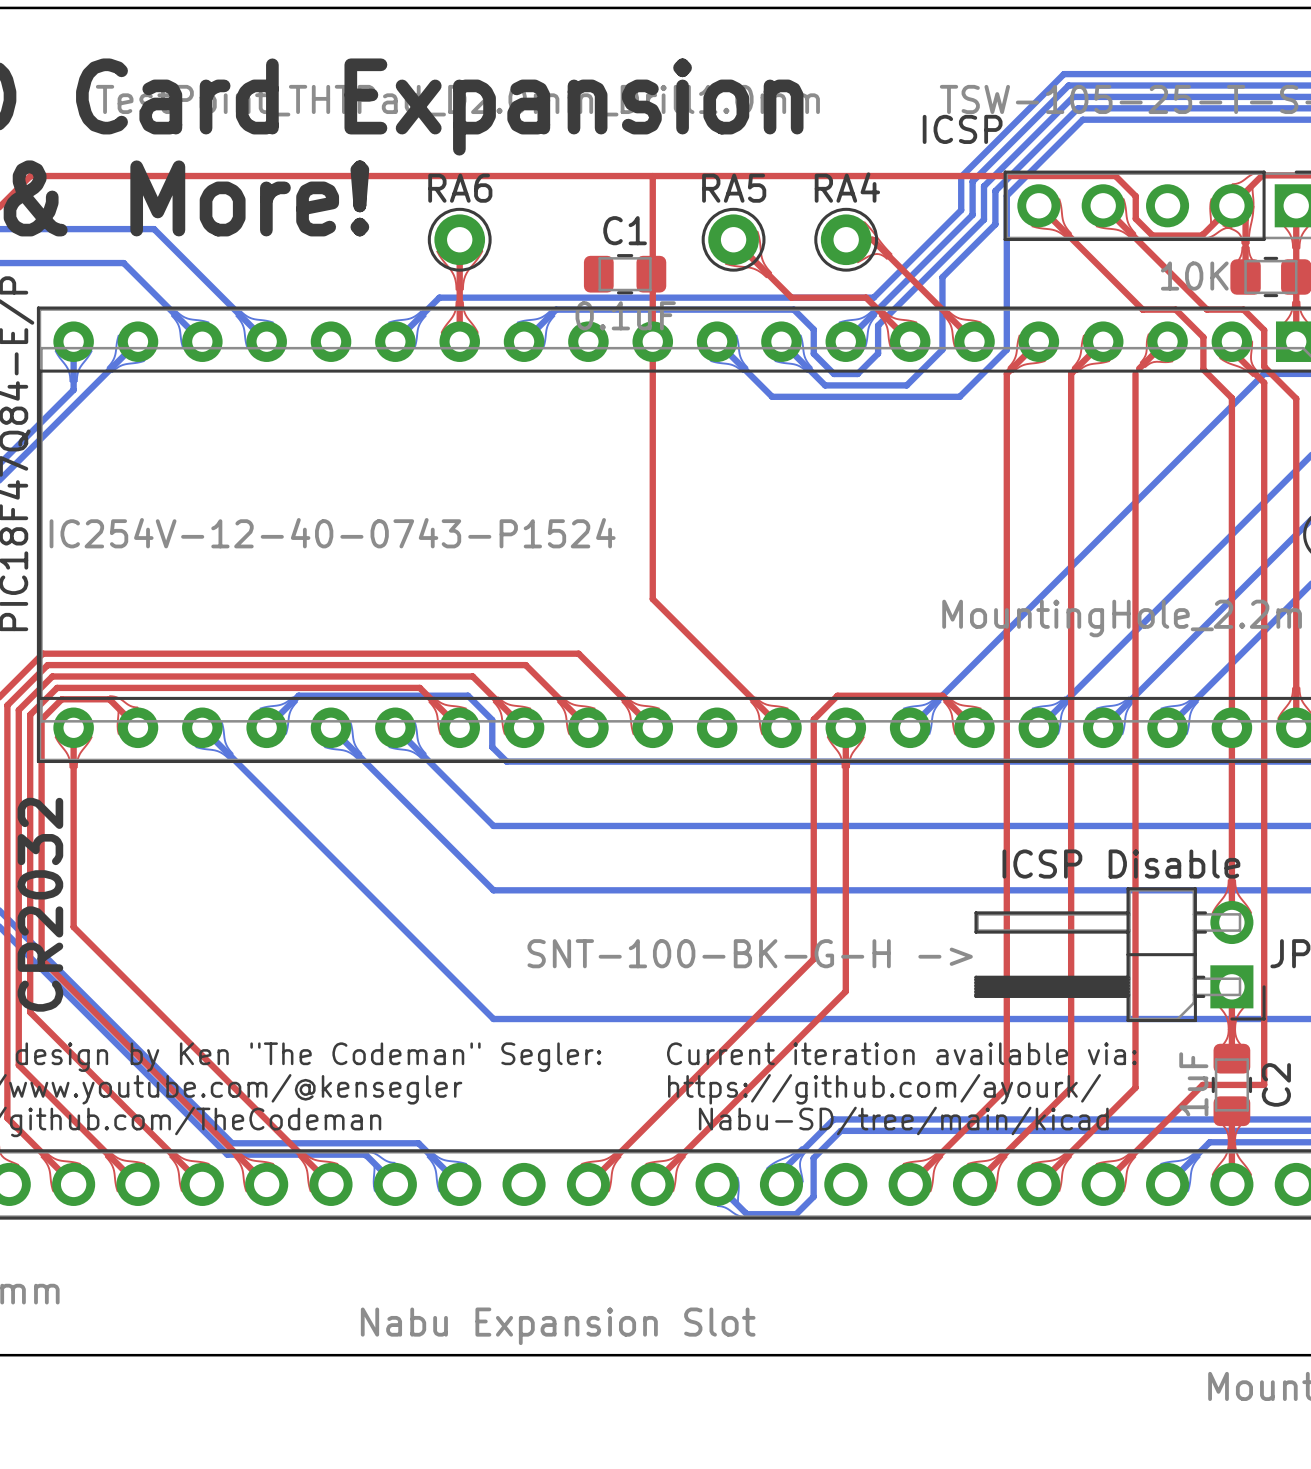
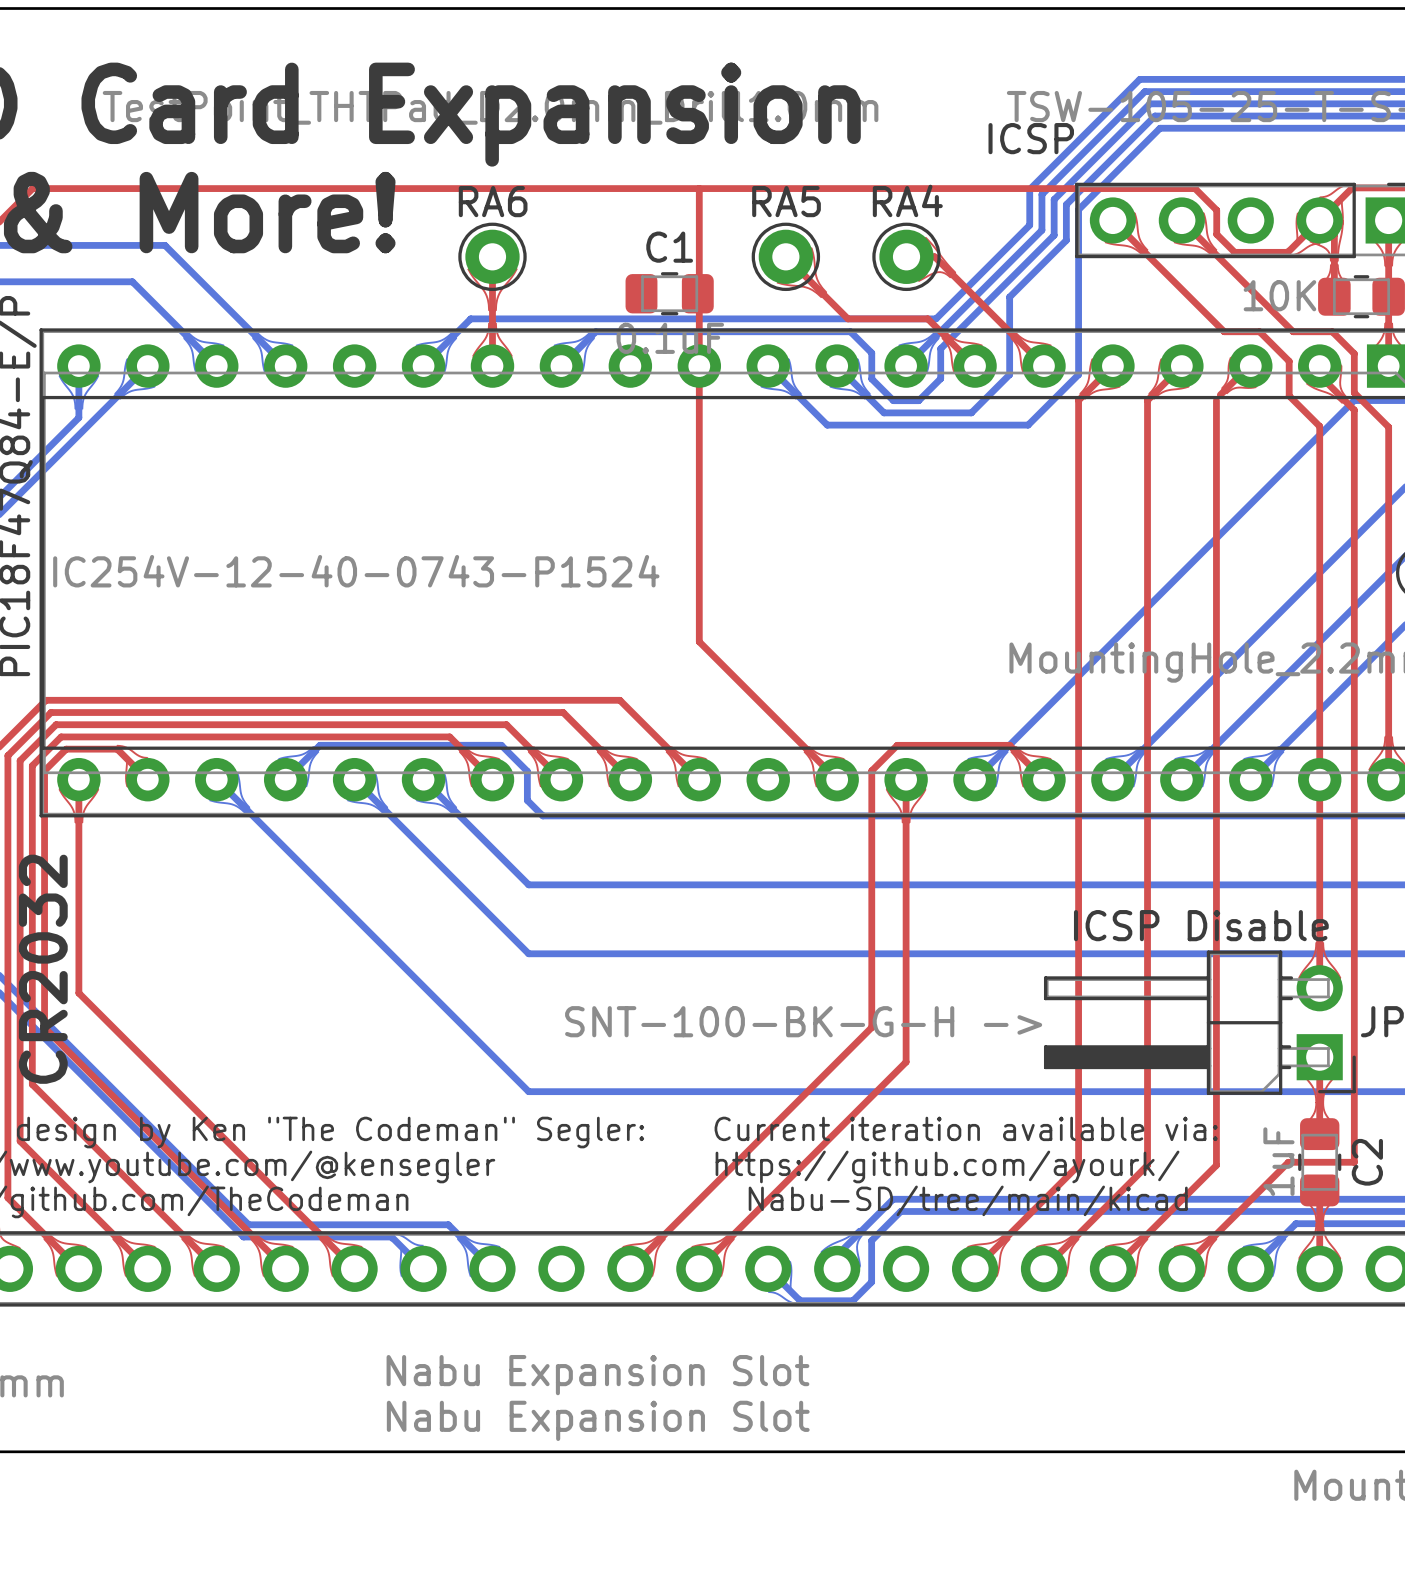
part text: none -> Nabu Expansion Slot (598, 1420)
part value position: Nabu Expansion Slot (558, 1326) -> Nabu Expansion Slot (597, 1375)

